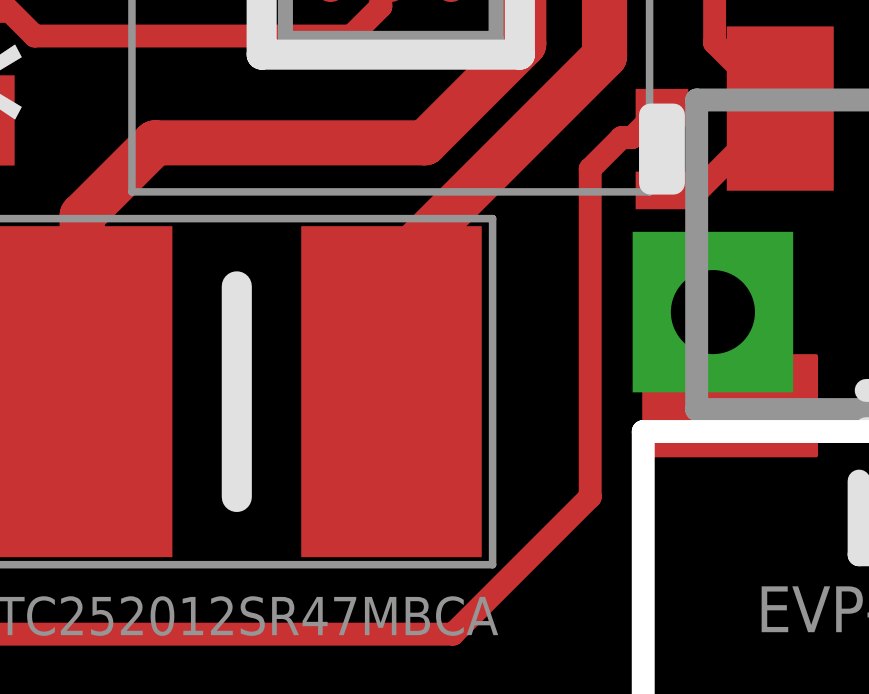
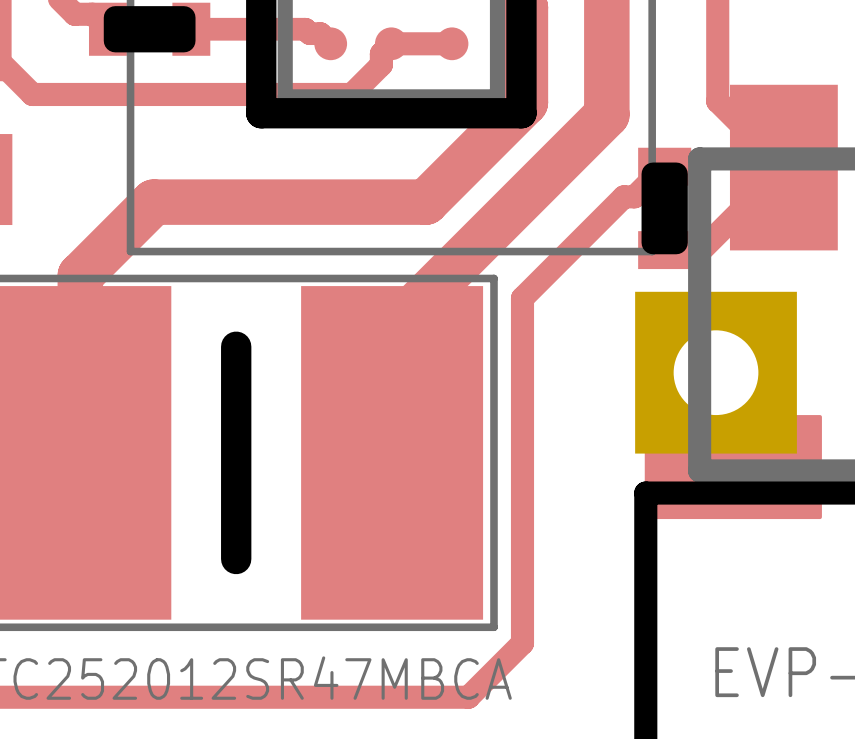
track: (590, 168) (590, 496) (452, 634) -> (592, 228) (522, 298) (522, 643) (468, 697) (454, 697)

